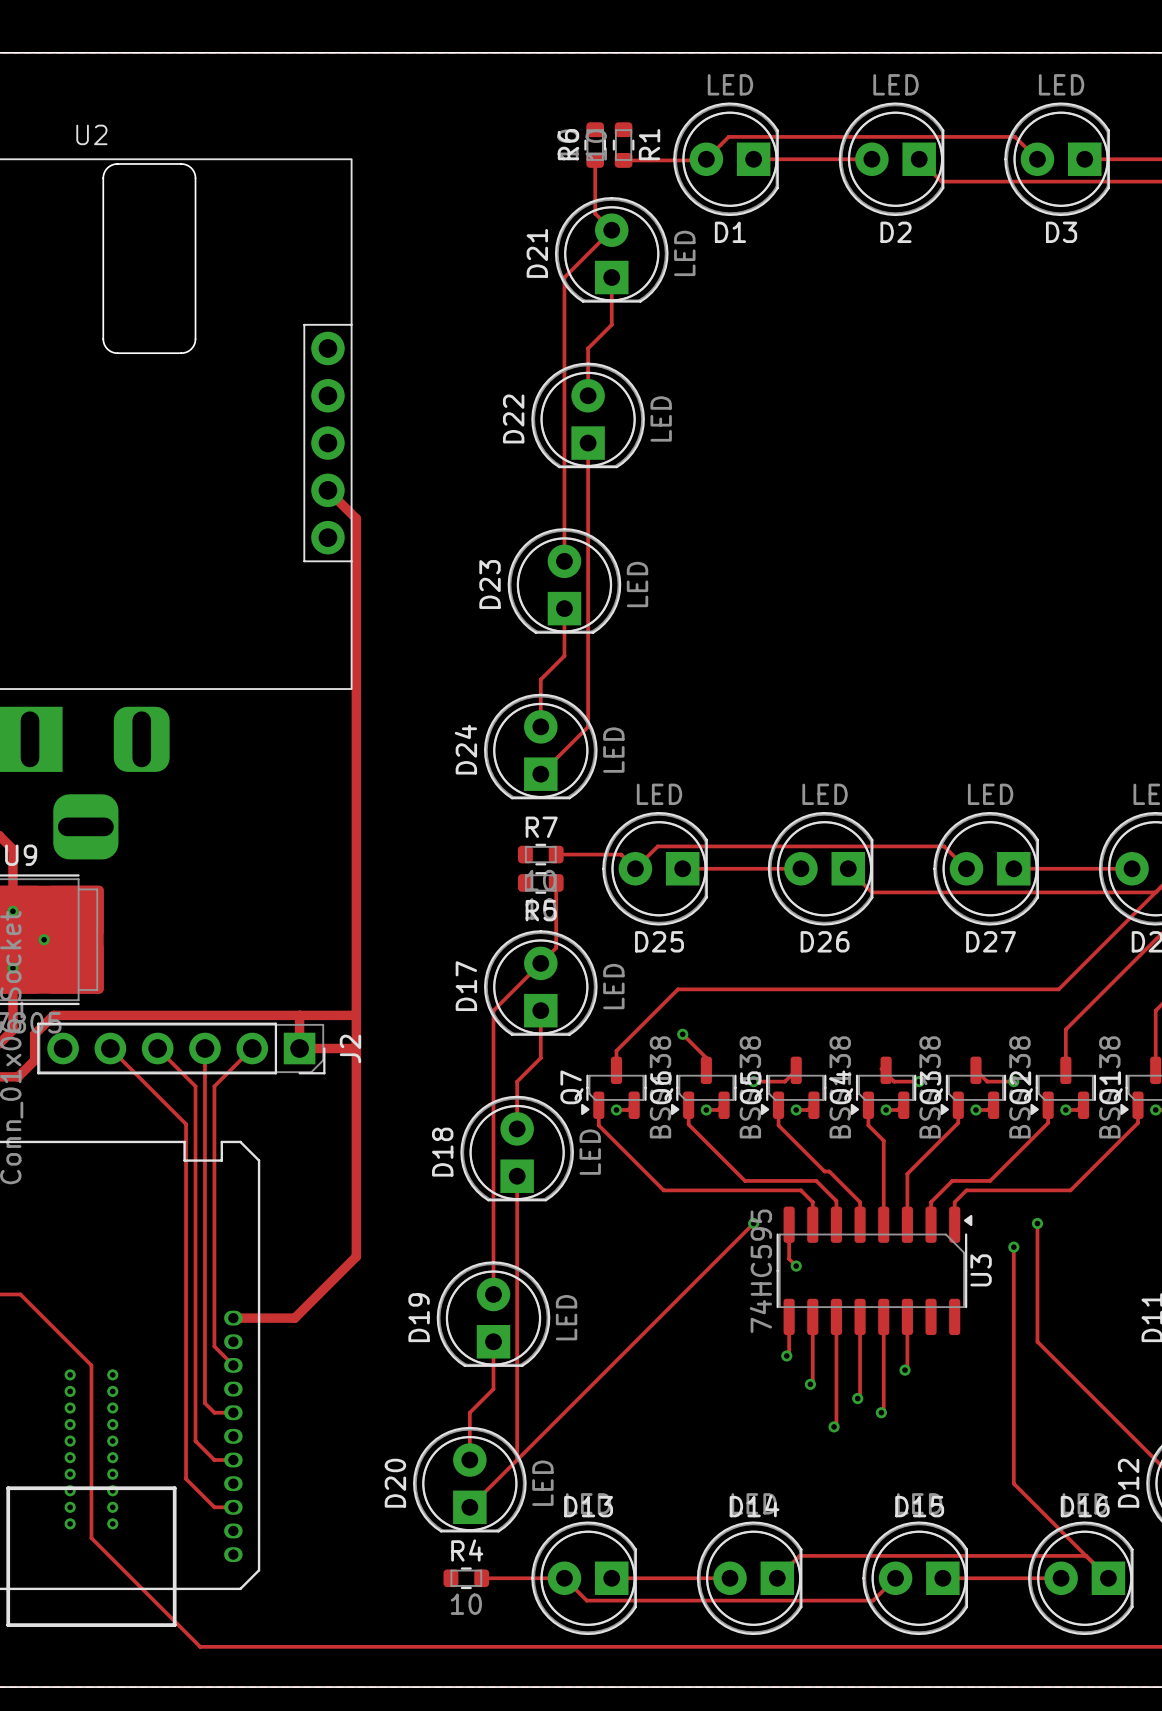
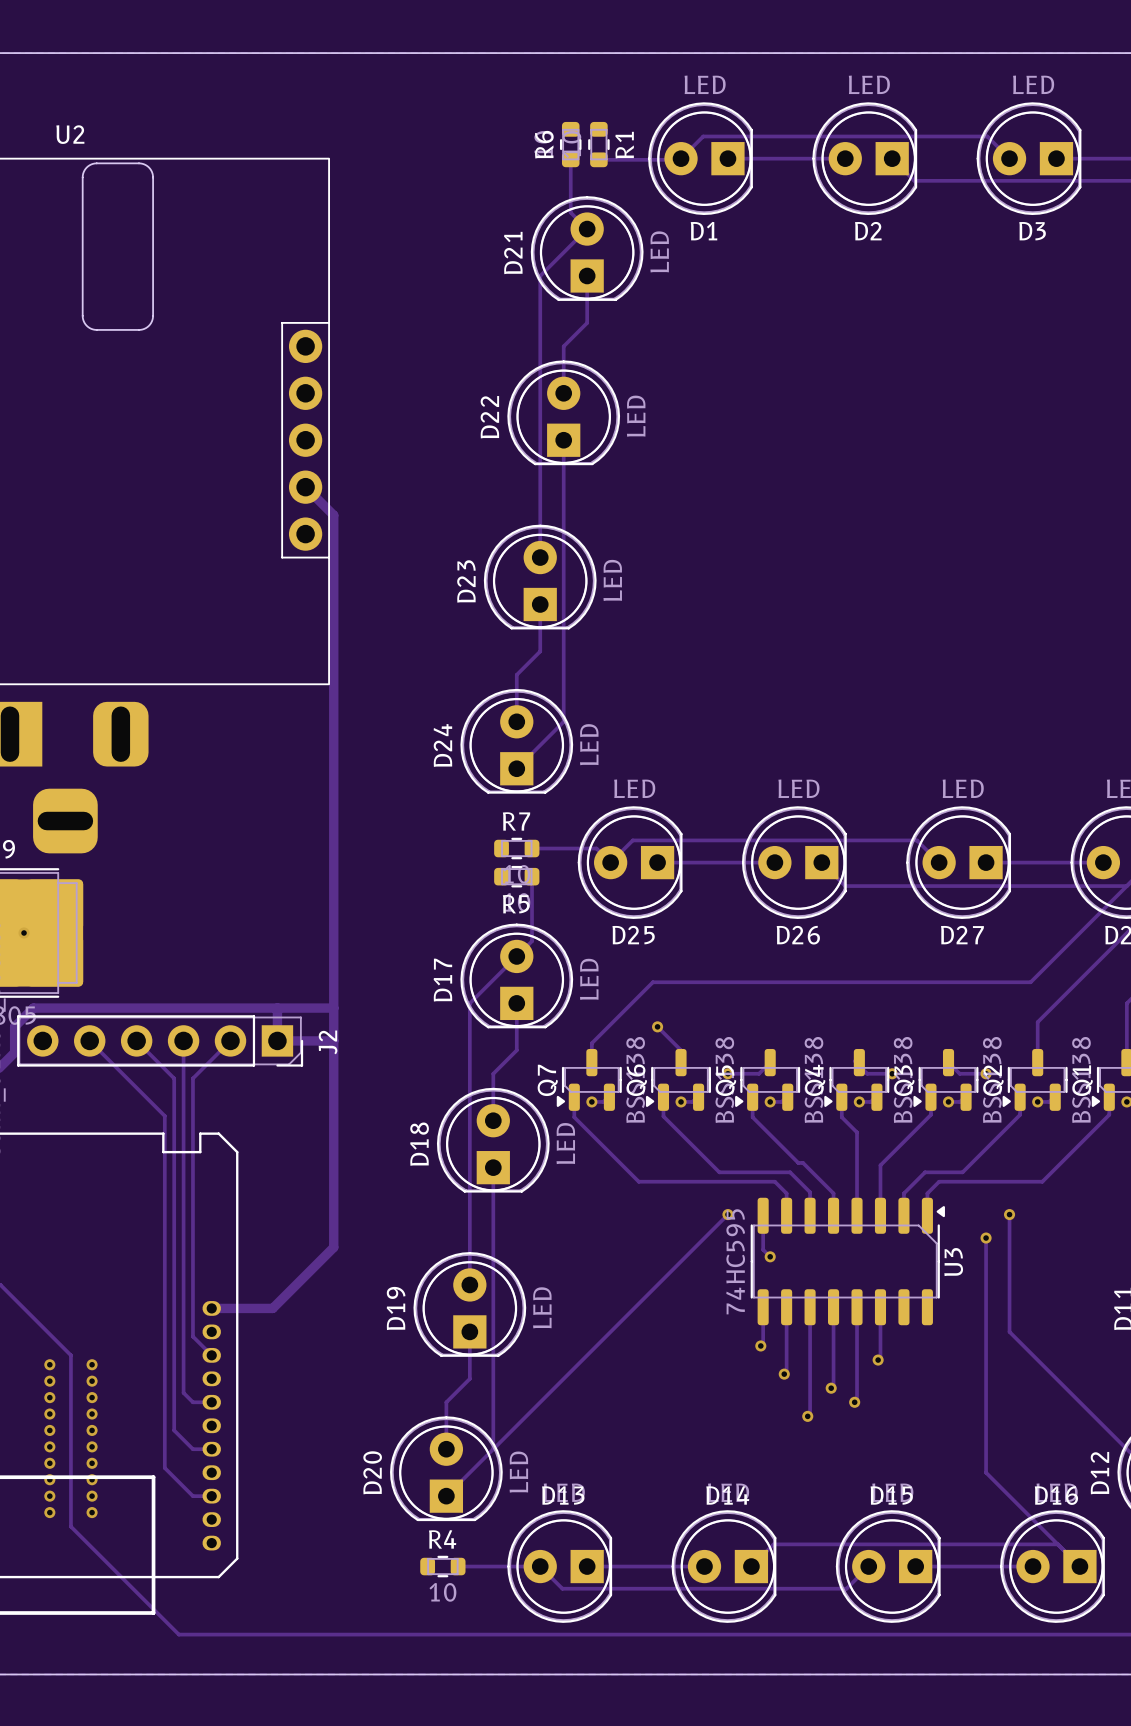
board edge: (160, 163) (186, 165) (192, 169) (195, 176) (195, 342) (191, 349) (183, 353) (118, 353) -> (138, 163) (147, 166) (152, 175) (152, 321) (147, 327) (140, 329) (94, 329) (85, 324) (82, 315)
board edge: (103, 317) (104, 344) (108, 350) (117, 353) -> none

